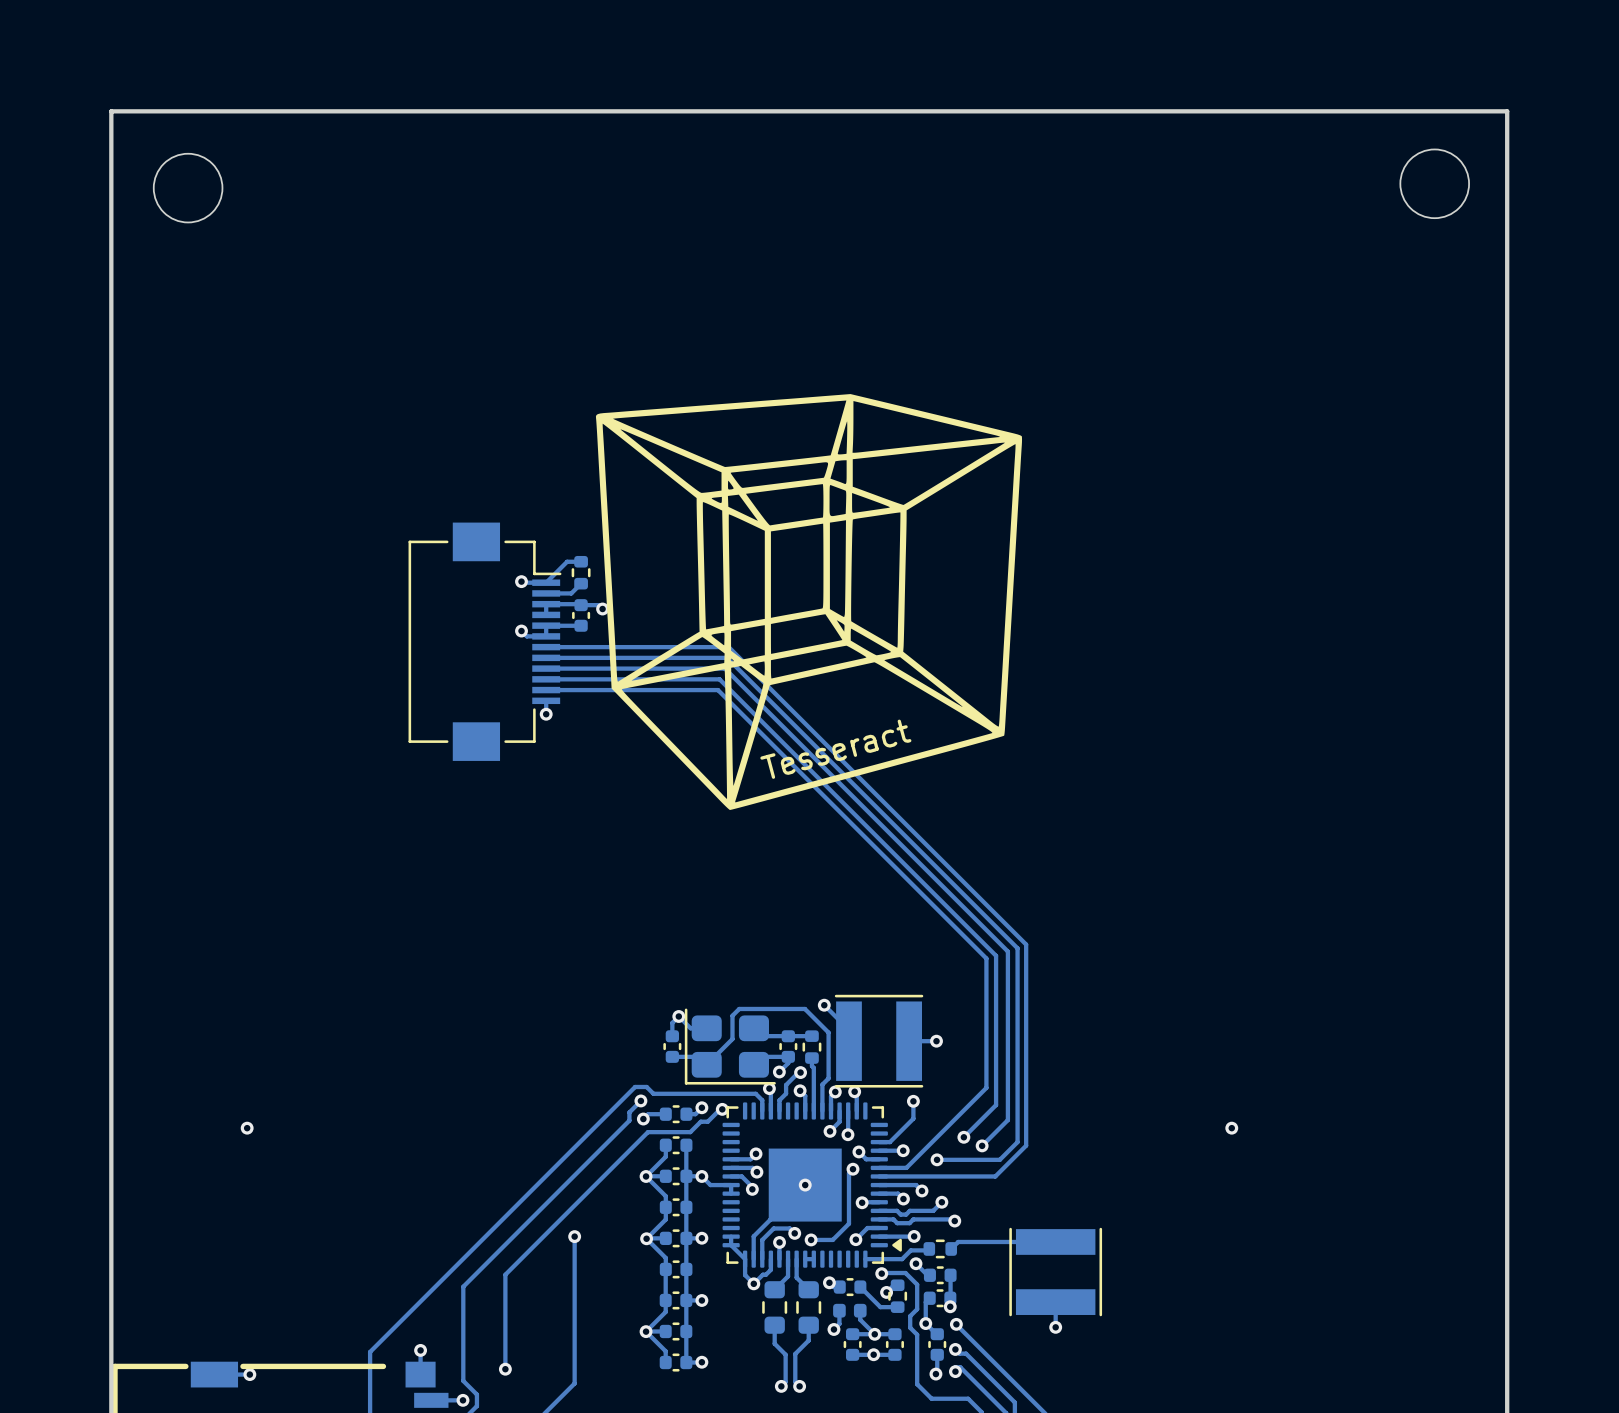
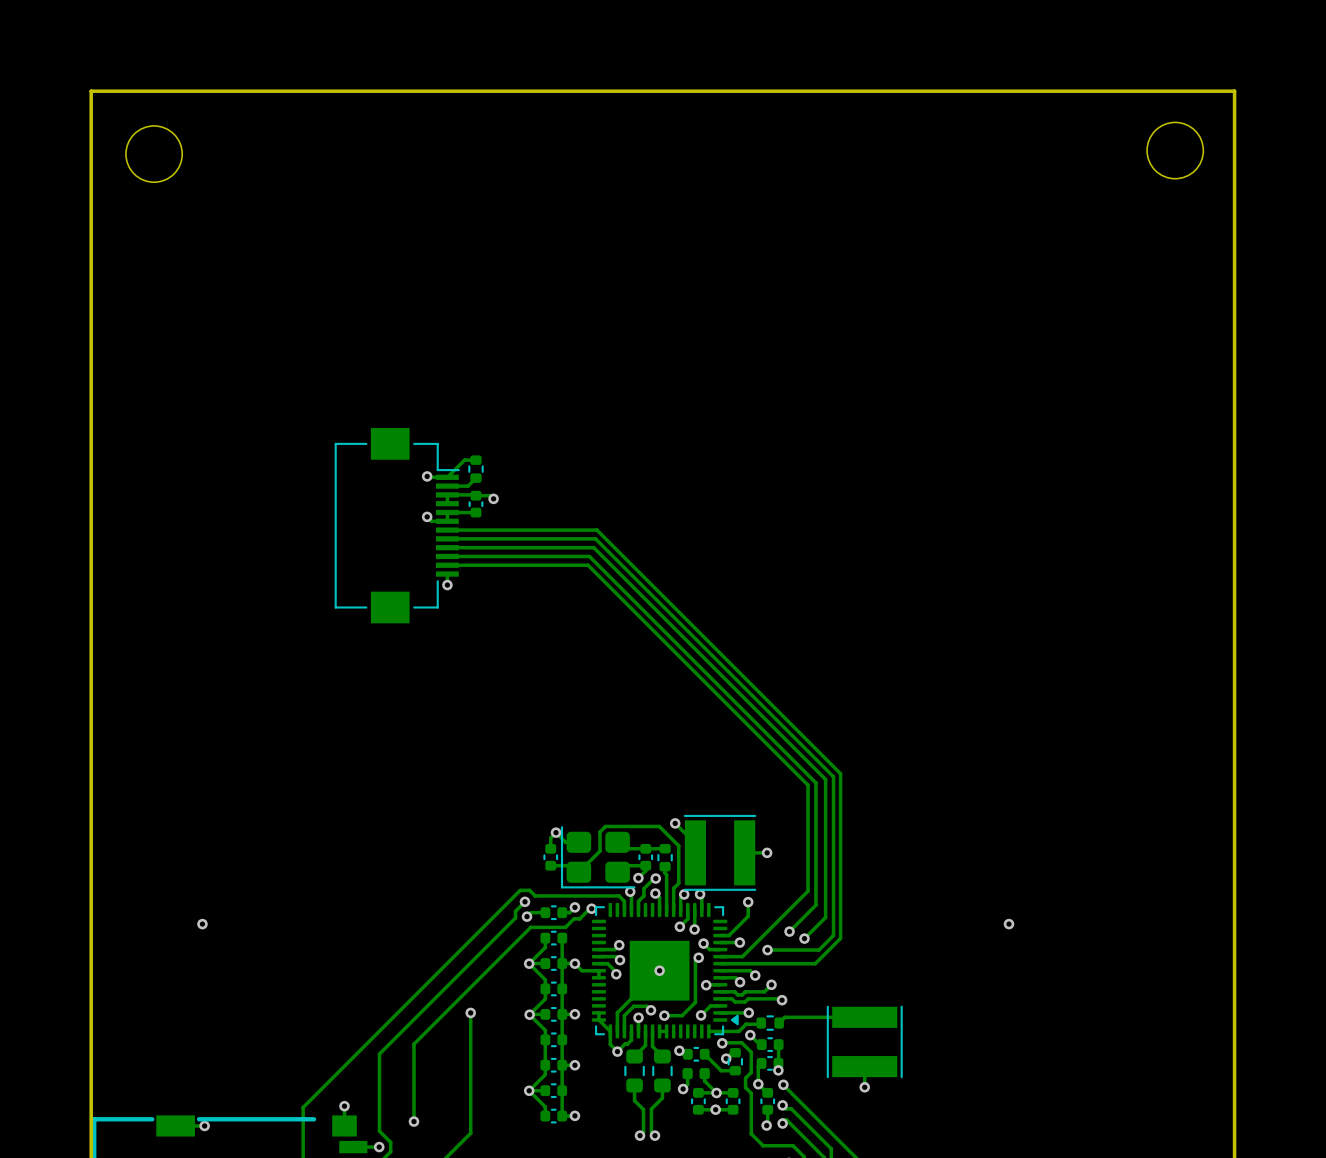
drawing: [595, 394, 1023, 811] -> none
text: Tesseract (835, 749) -> none

